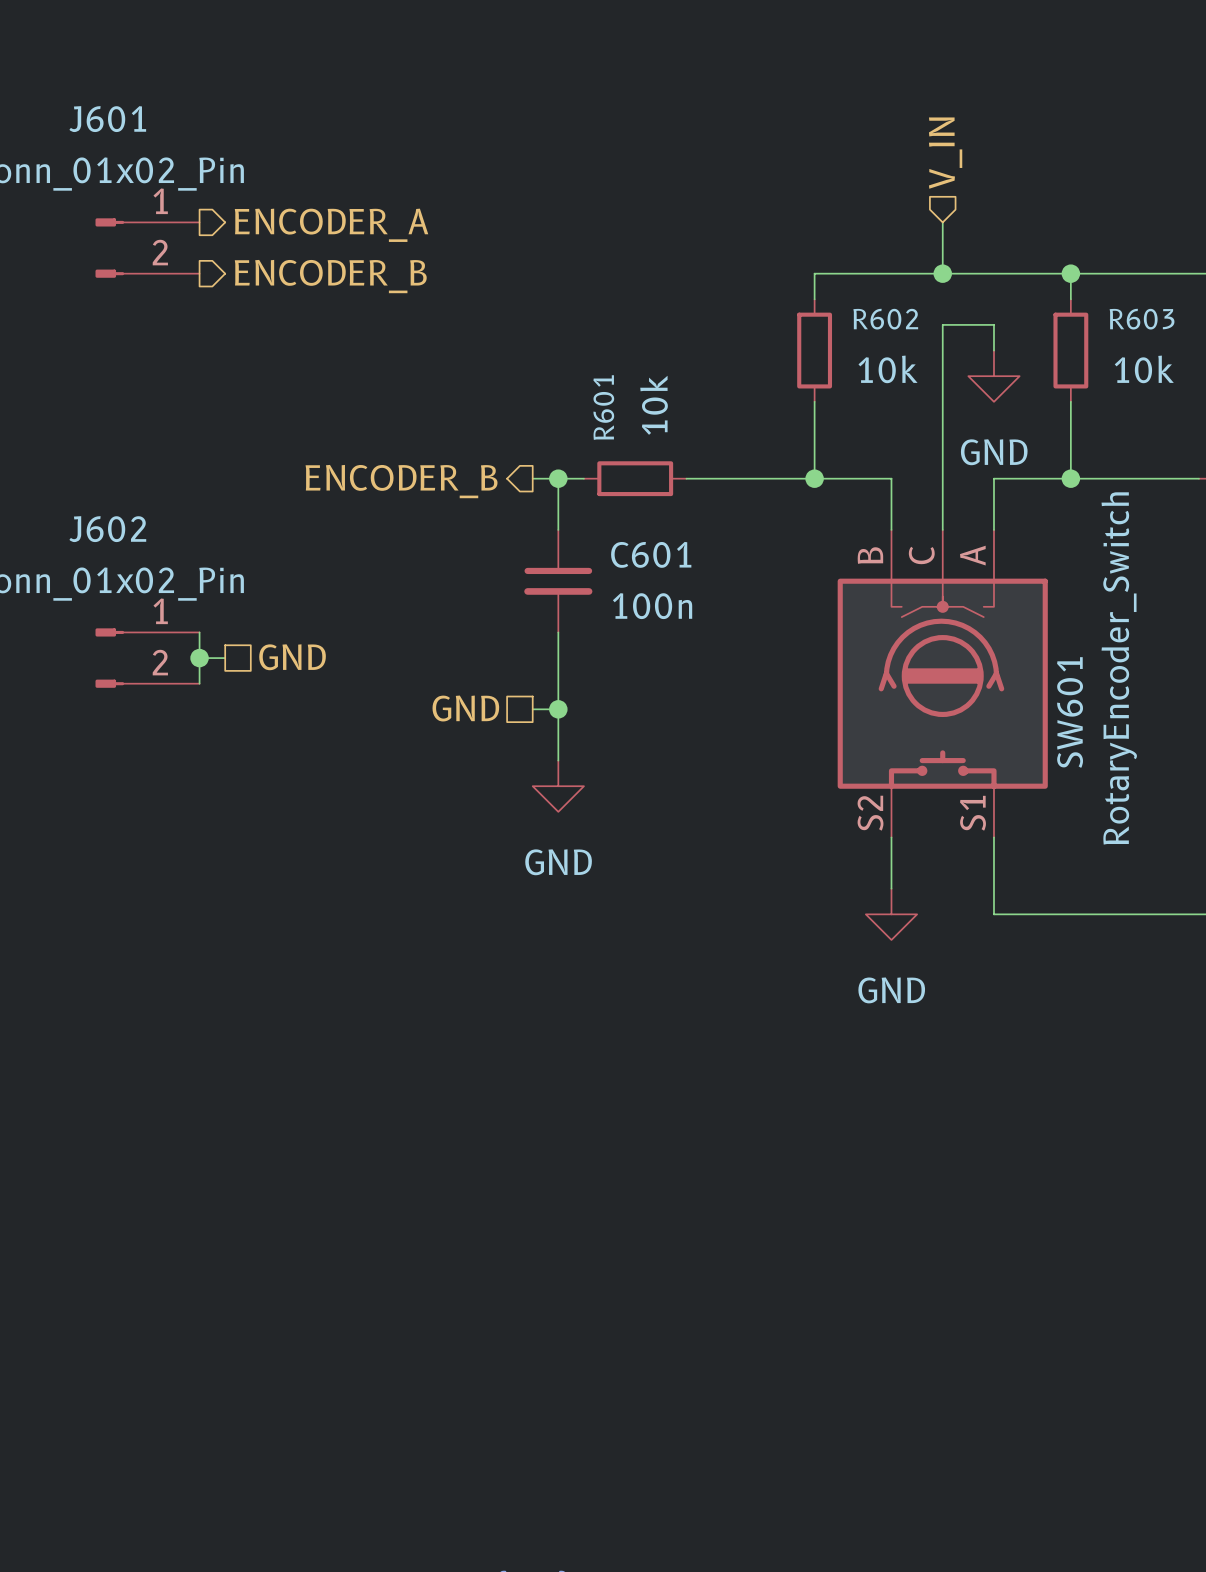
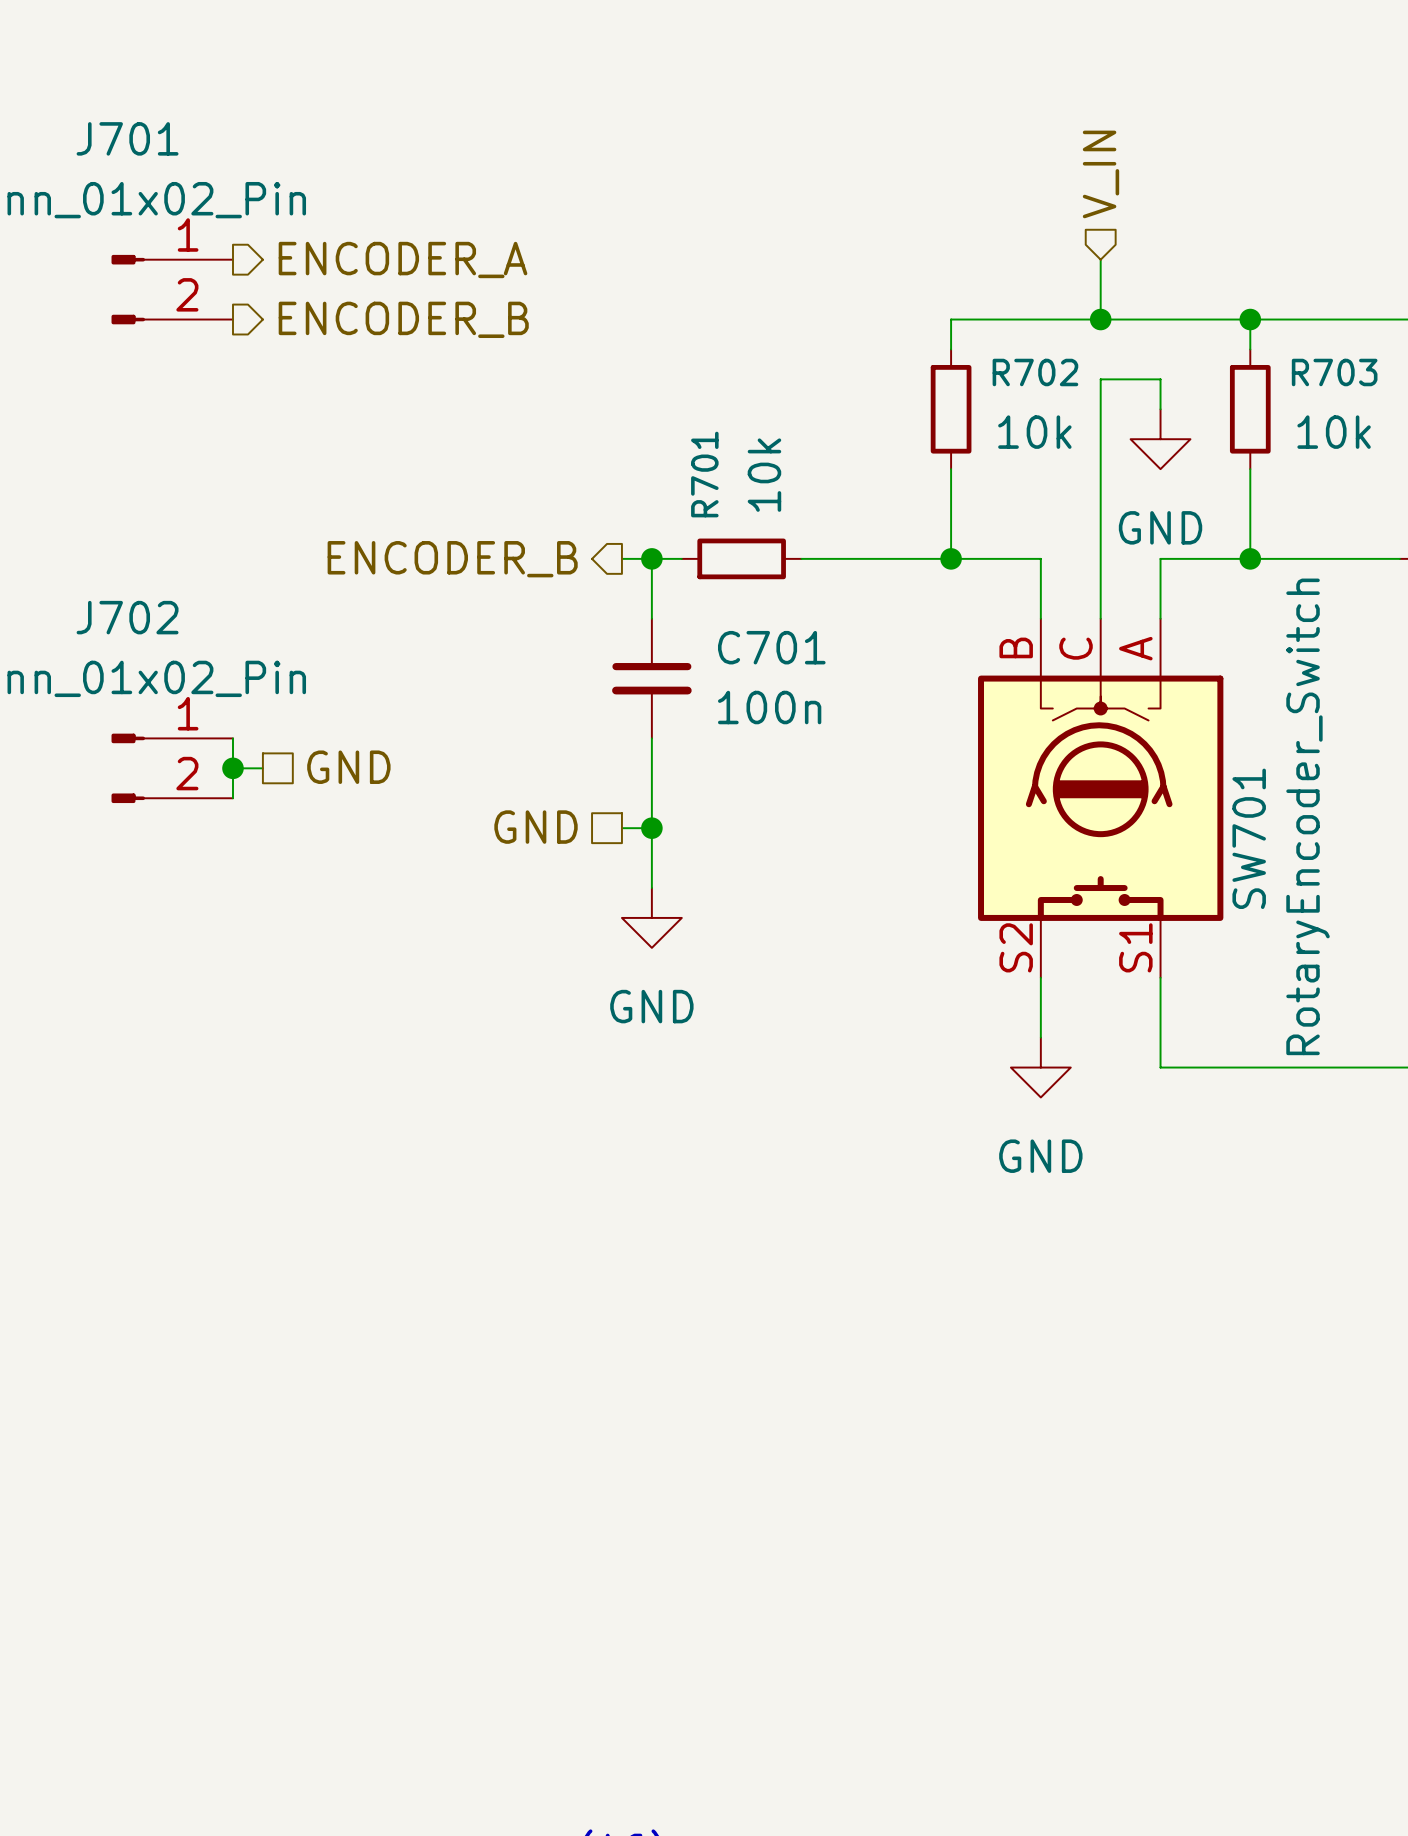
J601 name: J601 (107, 119) -> J701 (127, 138)
R602 name: R602 (885, 319) -> R702 (1035, 372)
R603 name: R603 (1142, 319) -> R703 (1334, 372)
R601 name: R601 (603, 407) -> R701 (704, 474)
J602 name: J602 (107, 529) -> J702 (127, 617)
C601 name: C601 (651, 554) -> C701 (771, 647)
SW601 name: SW601 (1070, 712) -> SW701 (1249, 838)

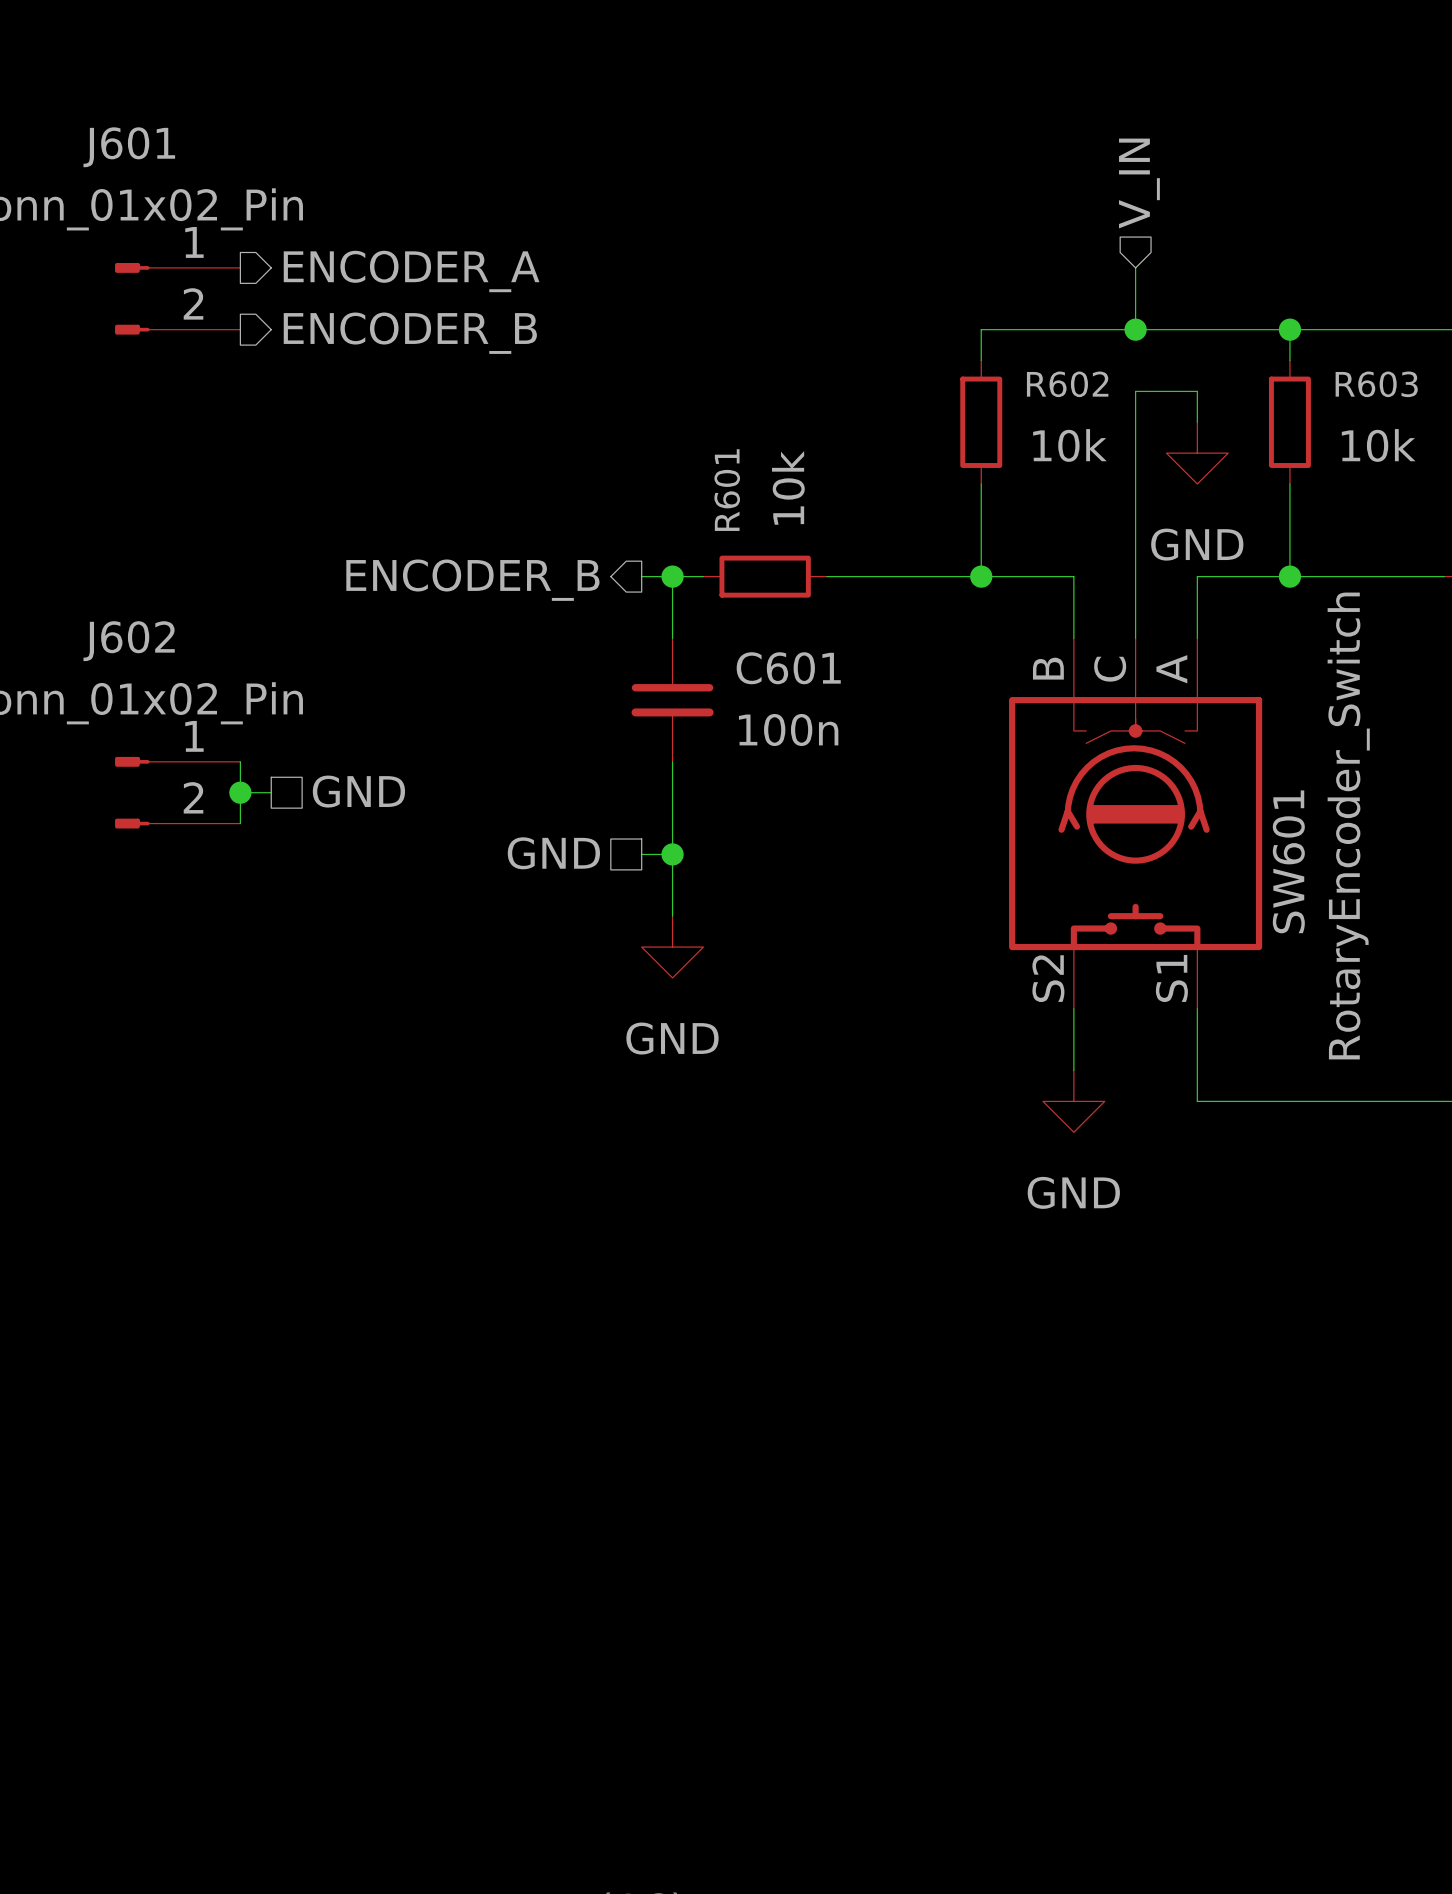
J701 name: J701 (127, 138) -> J601 (129, 147)
R702 name: R702 (1035, 372) -> R602 (1067, 384)
R703 name: R703 (1334, 372) -> R603 (1376, 384)
R701 name: R701 (704, 474) -> R601 (727, 490)
J702 name: J702 (127, 617) -> J602 (129, 641)
C701 name: C701 (771, 647) -> C601 (788, 668)
SW701 name: SW701 (1249, 838) -> SW601 (1288, 861)

